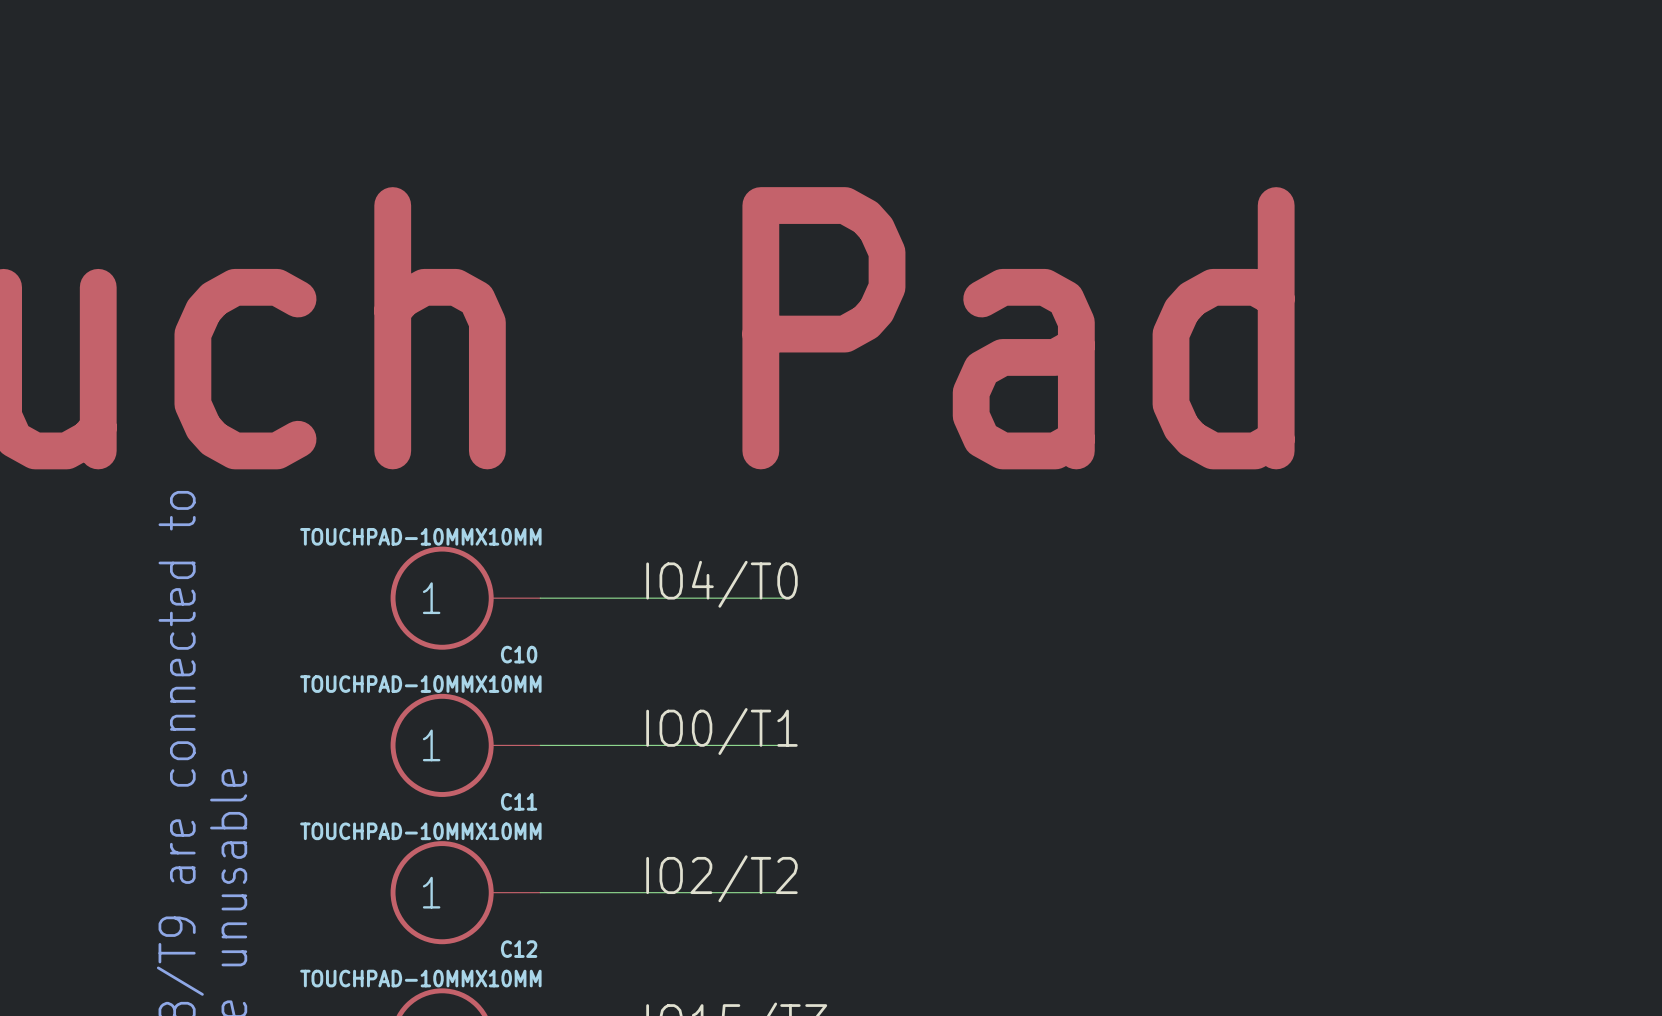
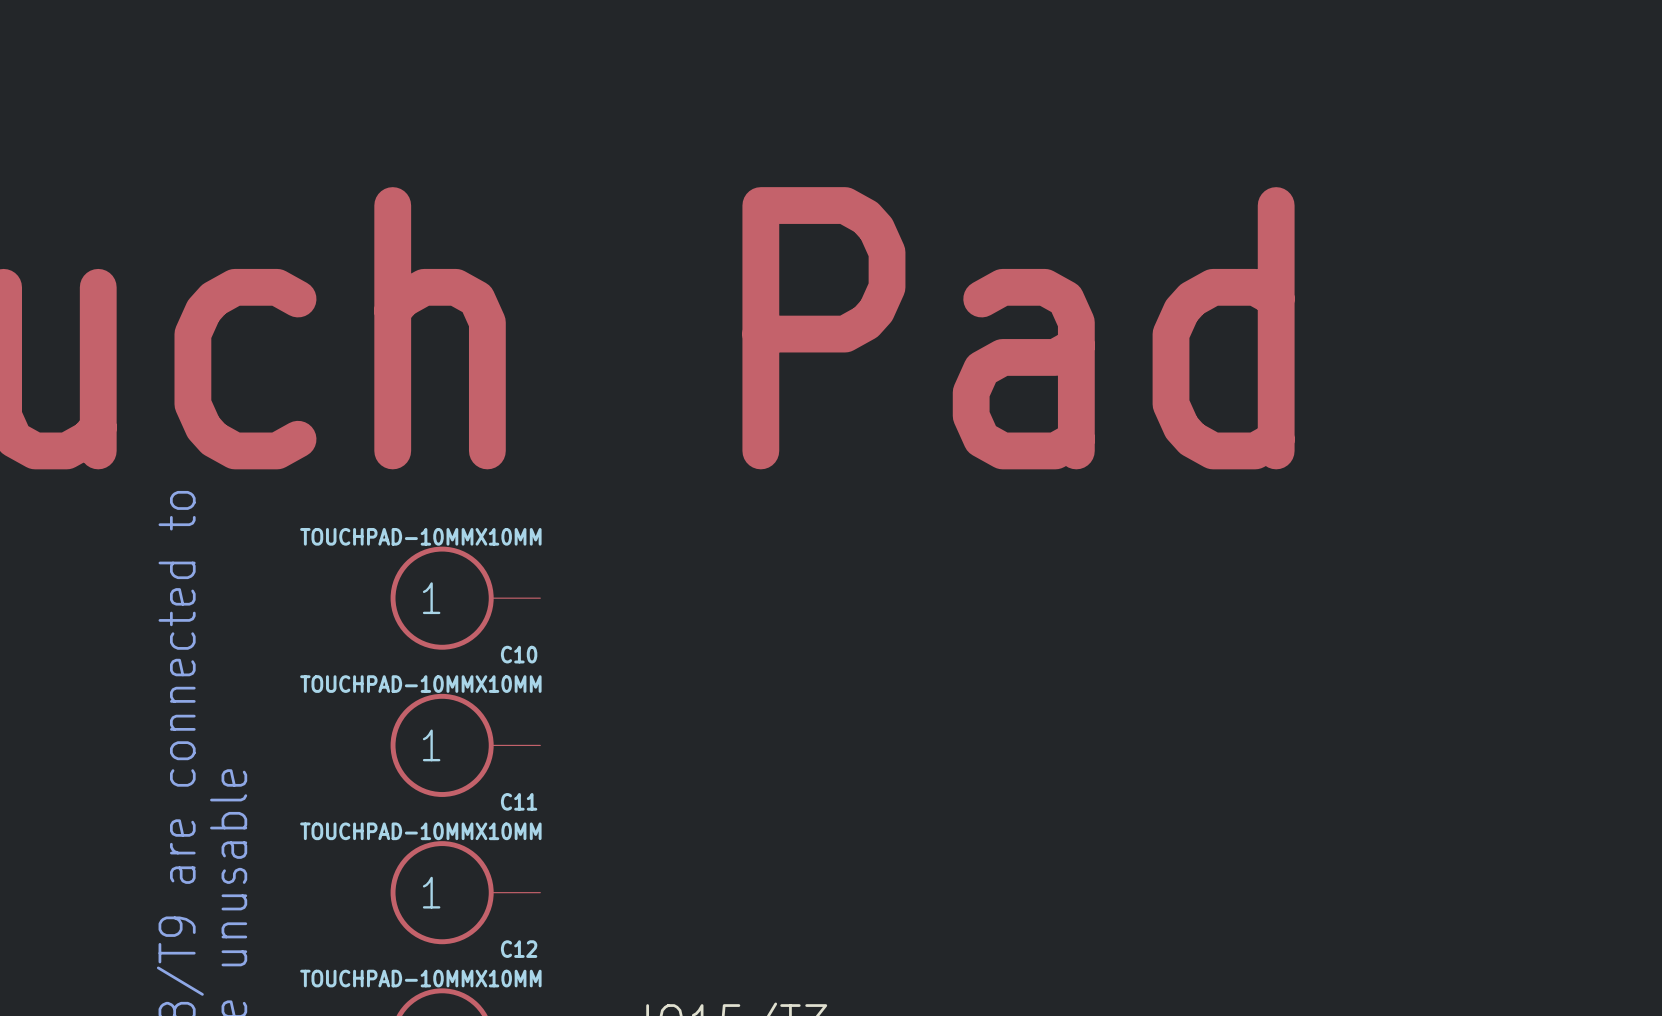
label: IO4/T0 (721, 584) -> none
wire: (540, 598) (785, 598) -> none
label: IO0/T1 (721, 731) -> none
wire: (540, 745) (785, 745) -> none
label: IO2/T2 (721, 878) -> none
wire: (540, 892) (785, 892) -> none

